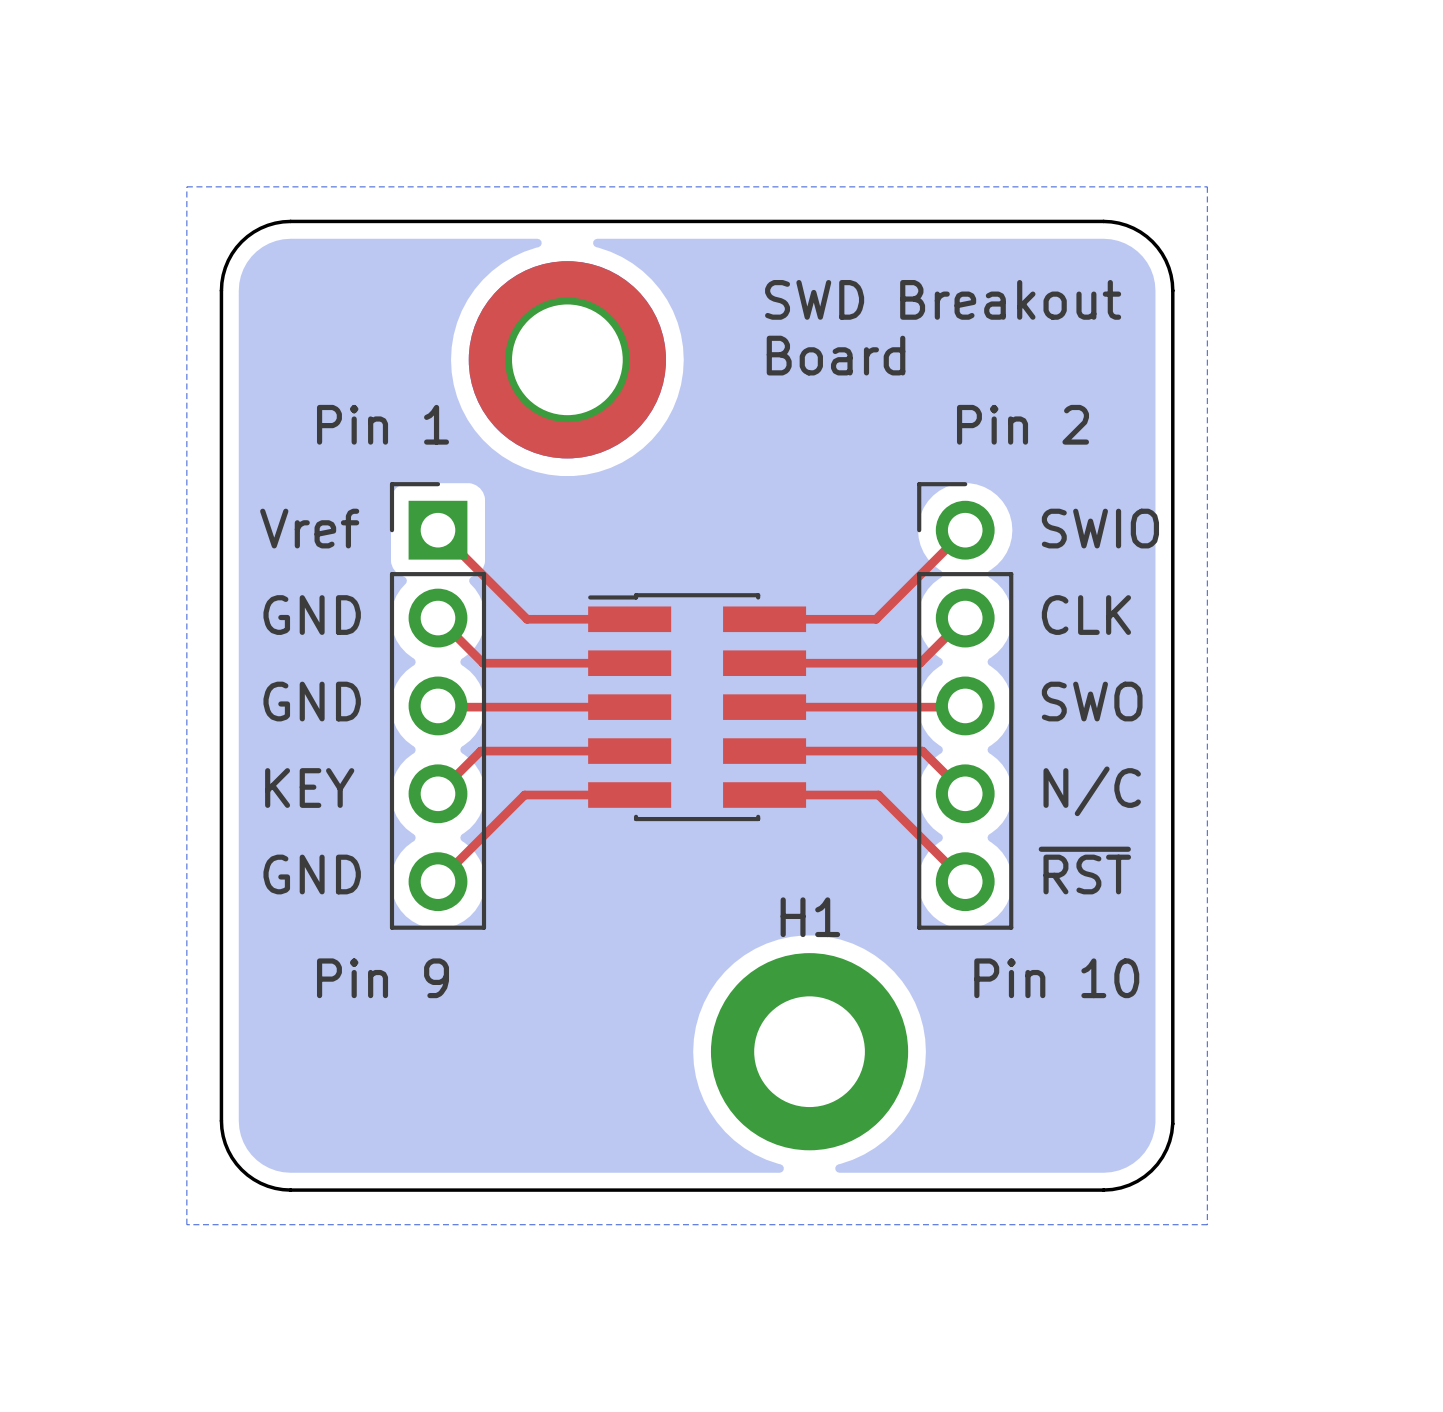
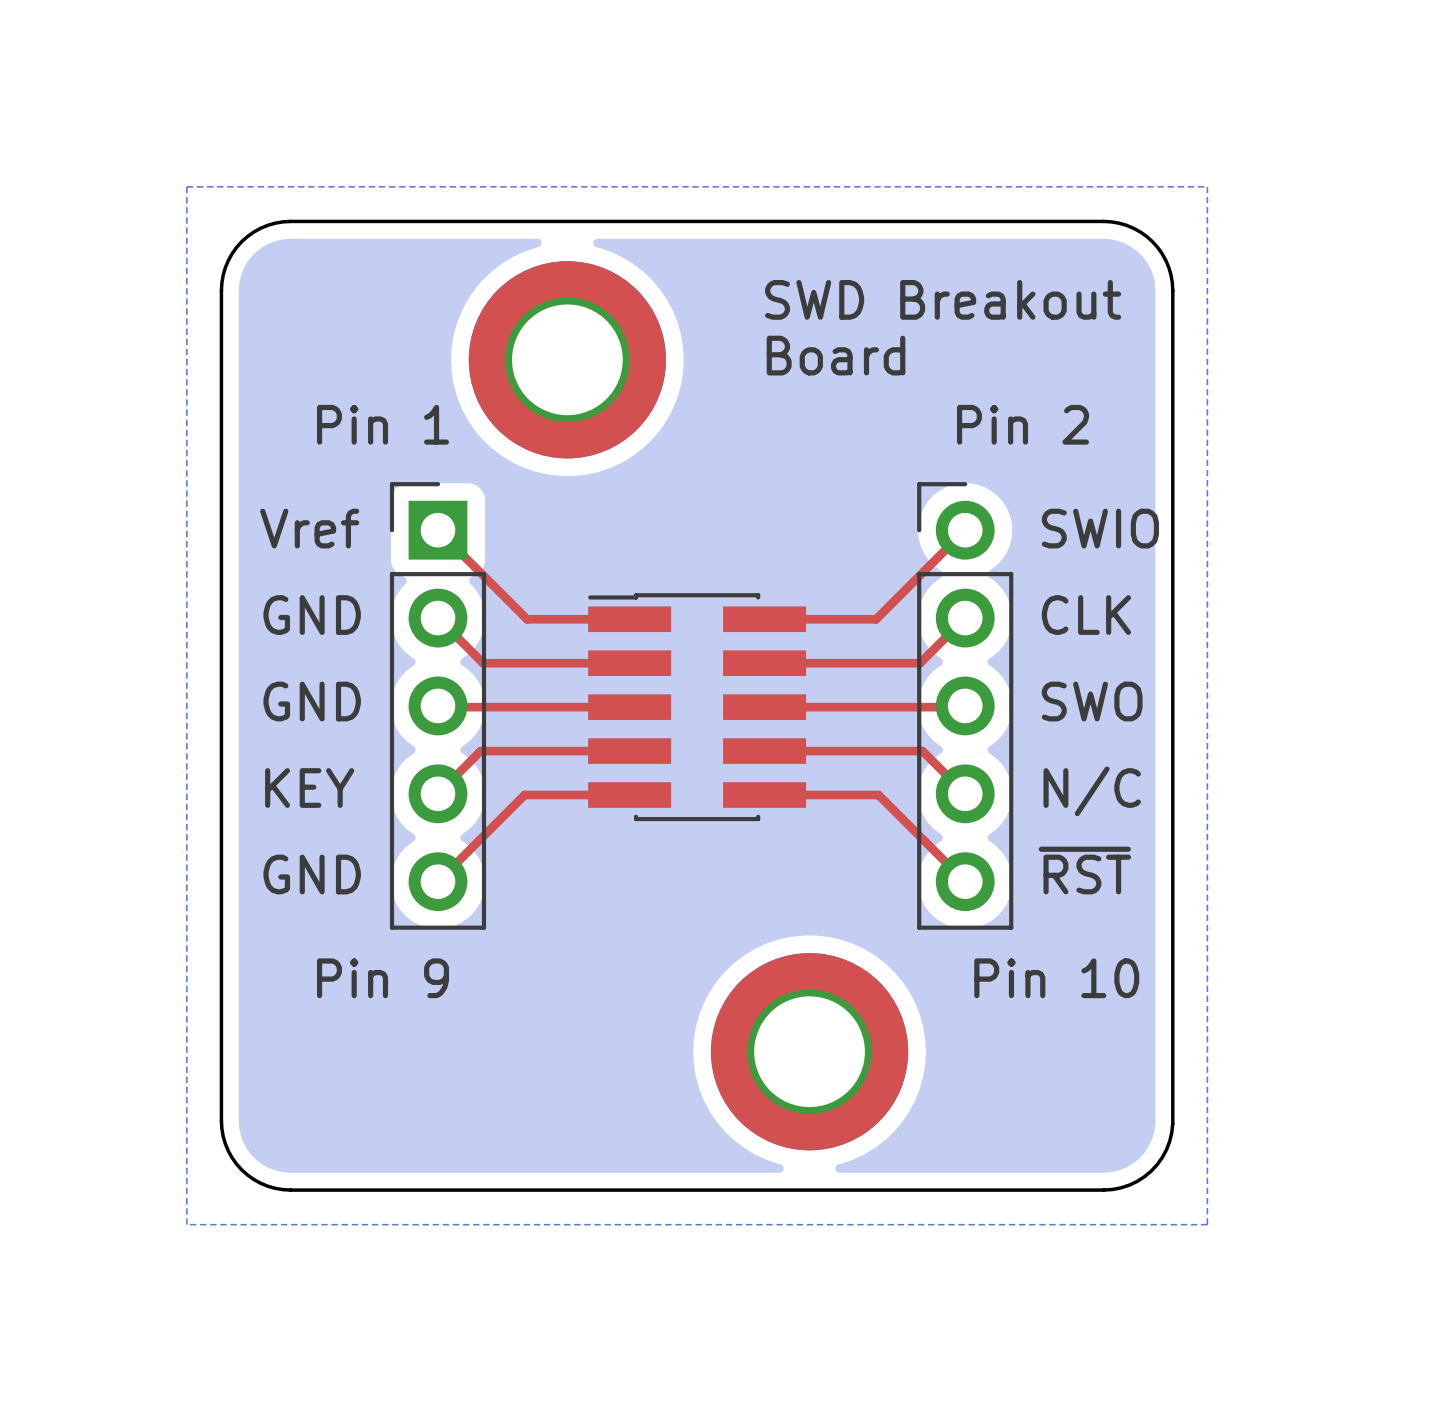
H1: (809, 1051) -> none
part: none -> (809, 1051)

